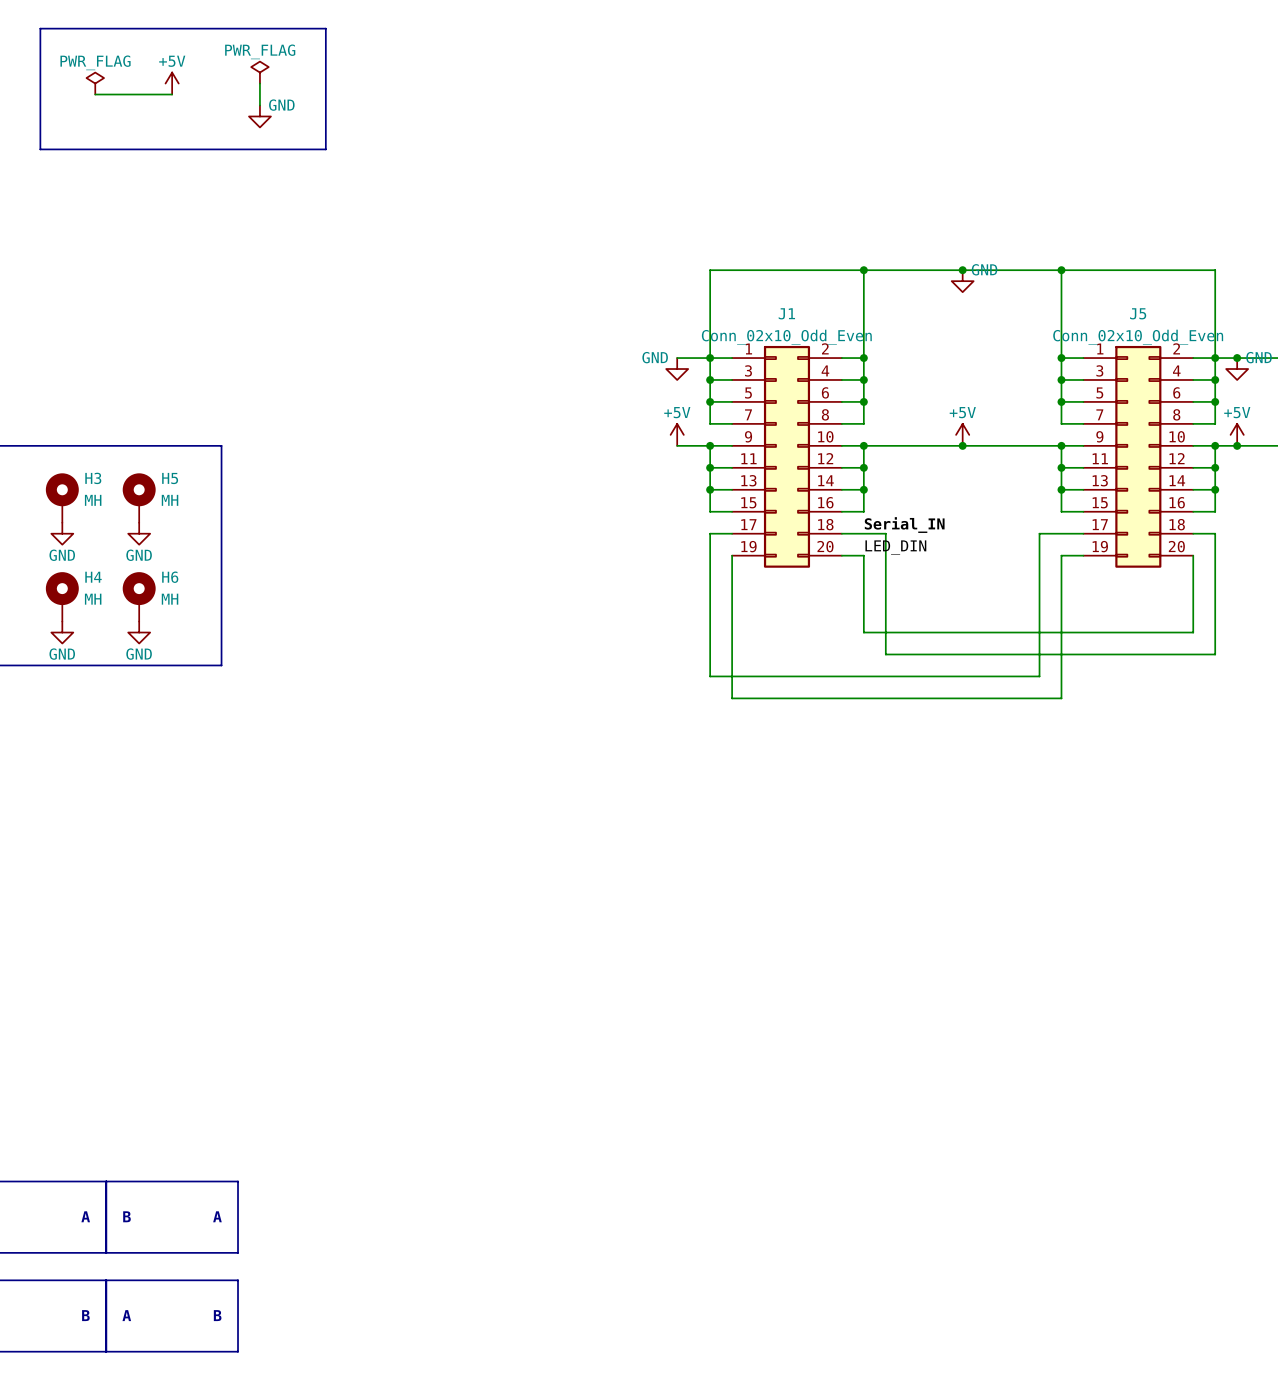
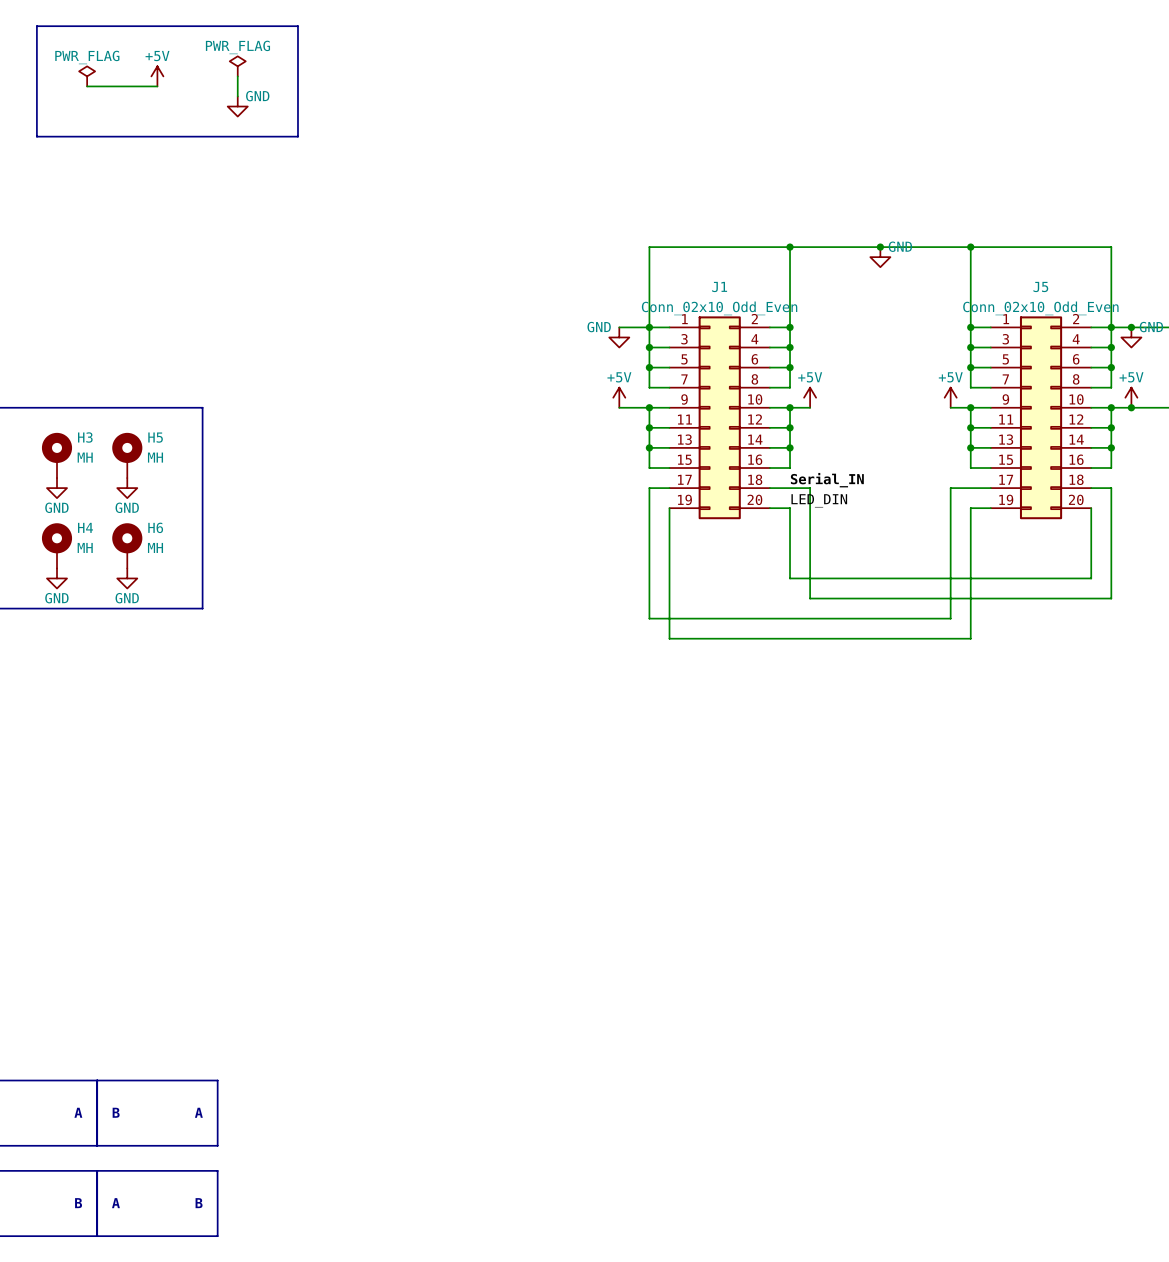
power symbol: none -> +5V (810, 397)
power symbol: +5V (962, 434) -> none
power symbol: none -> +5V (950, 397)
wire: (885, 445) (1039, 445) -> none
junction: (962, 445) -> none

